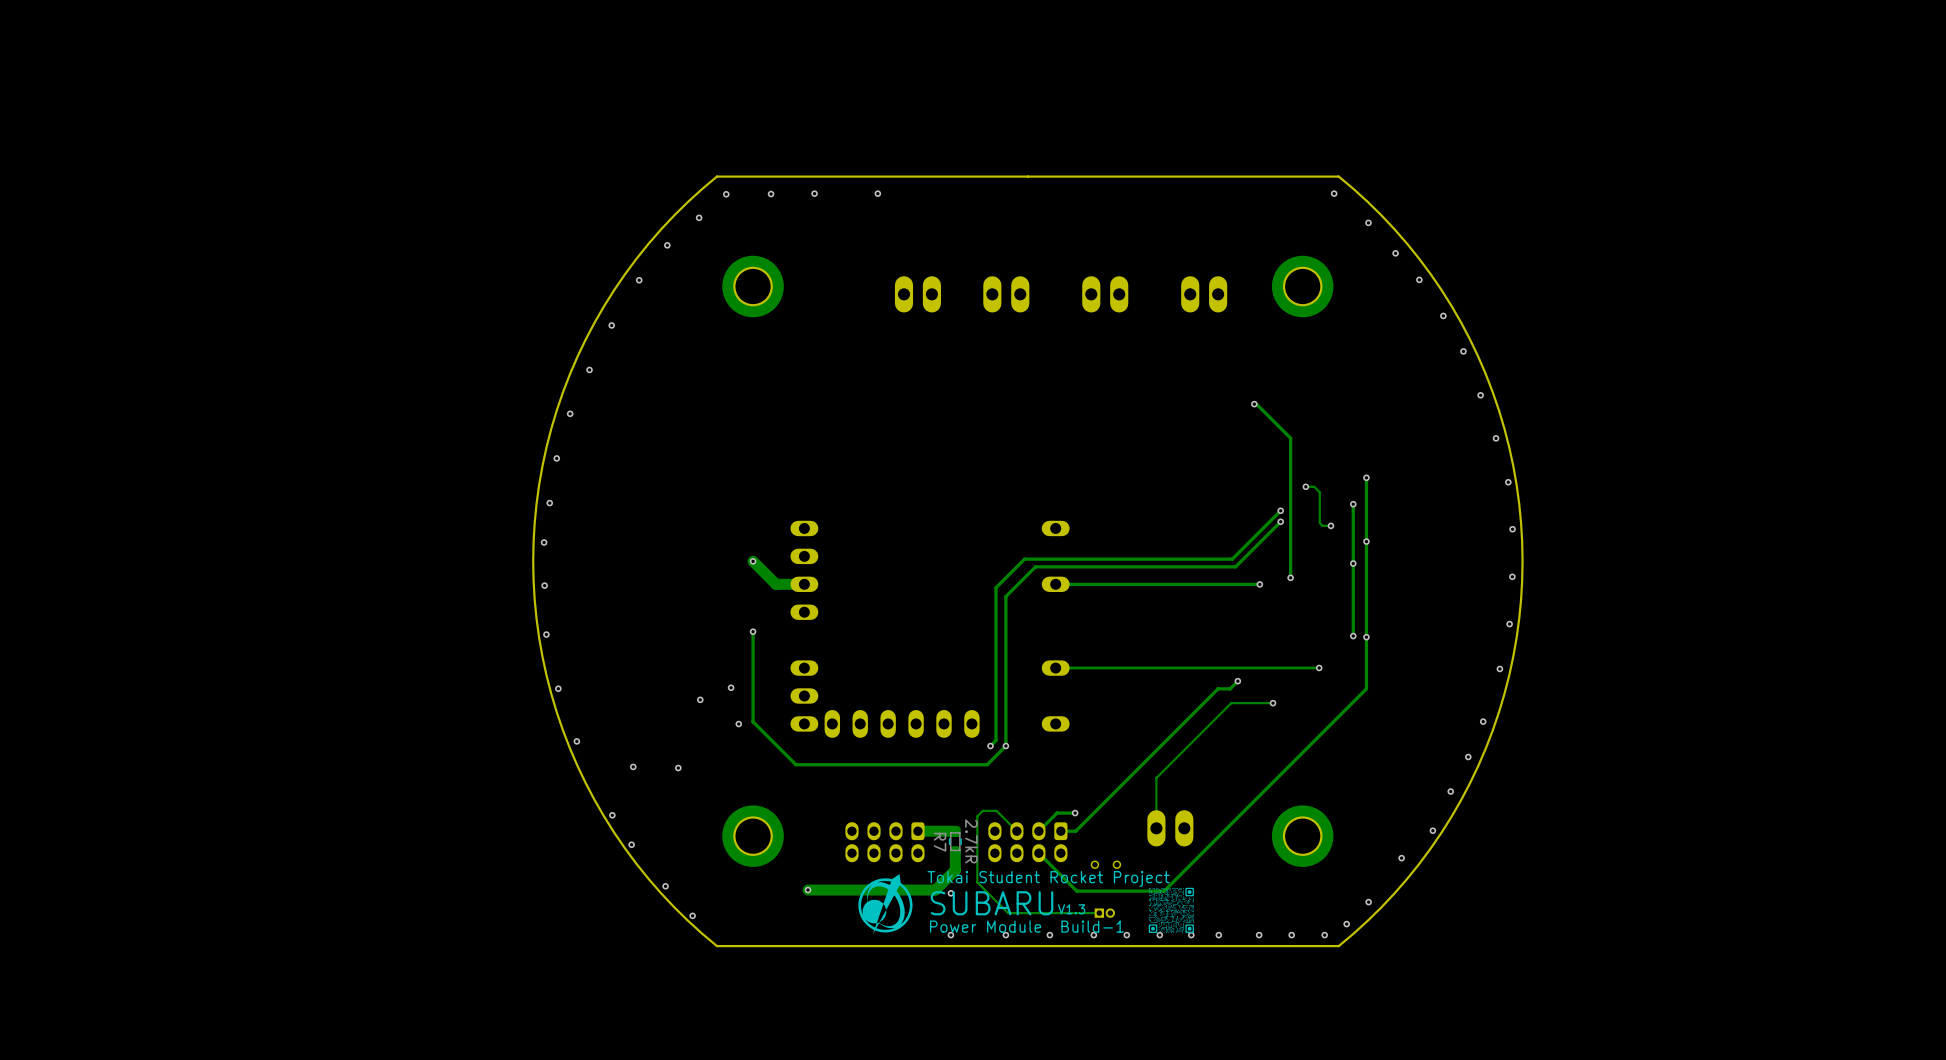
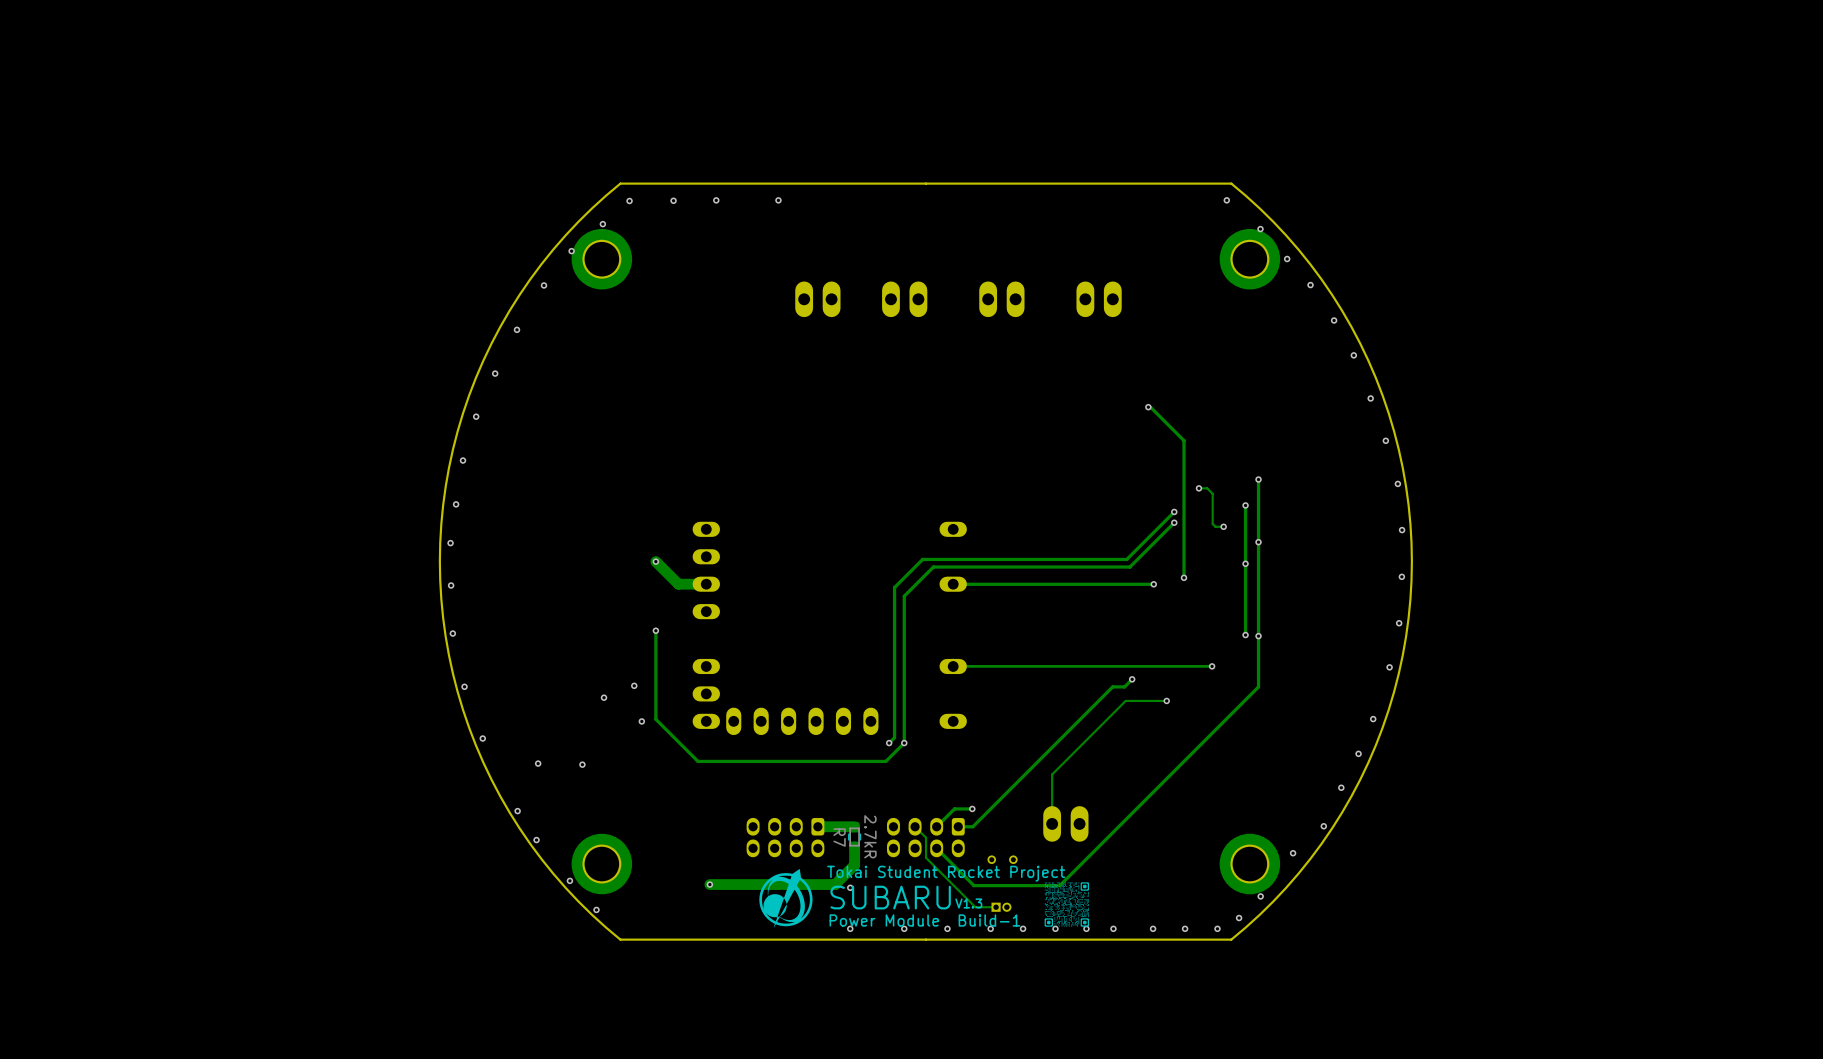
part position: (753, 286) -> (601, 259)
part position: (1302, 286) -> (1249, 259)
track: (1016, 831) (996, 810) (982, 810) (977, 816) (977, 882) (1008, 913) (1078, 913) -> (915, 826) (926, 837) (926, 857) (975, 907)
part position: (753, 836) -> (601, 864)
part position: (1302, 836) -> (1249, 864)

